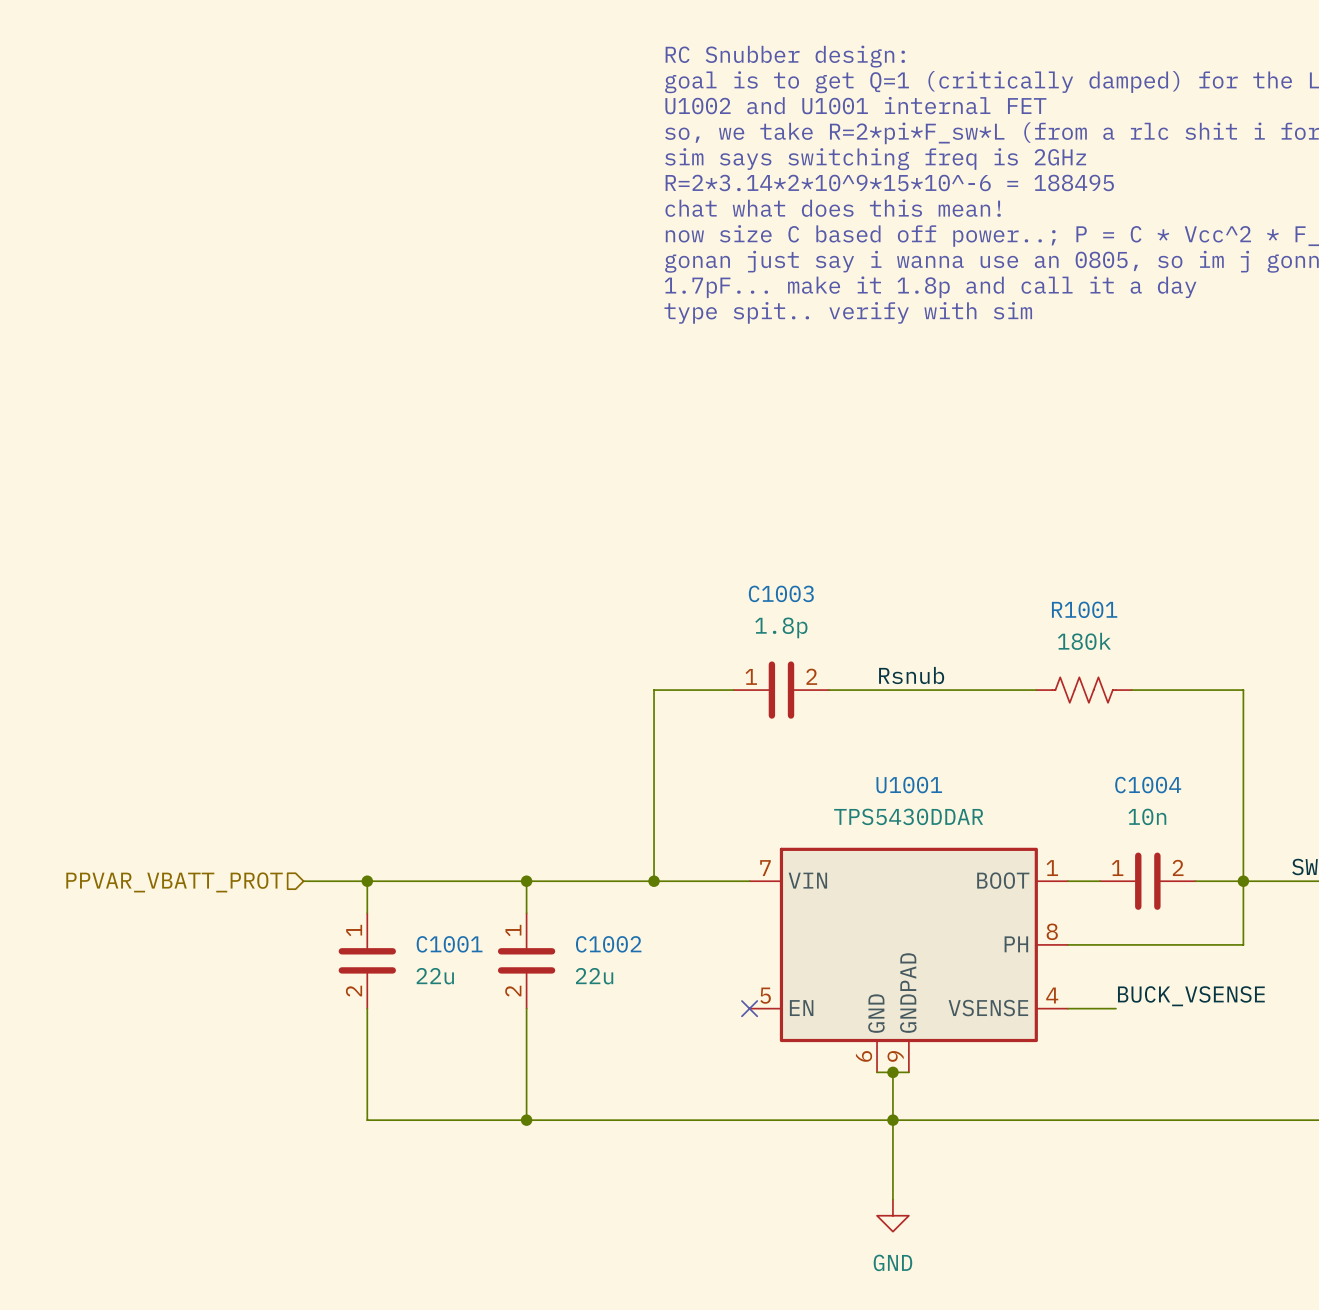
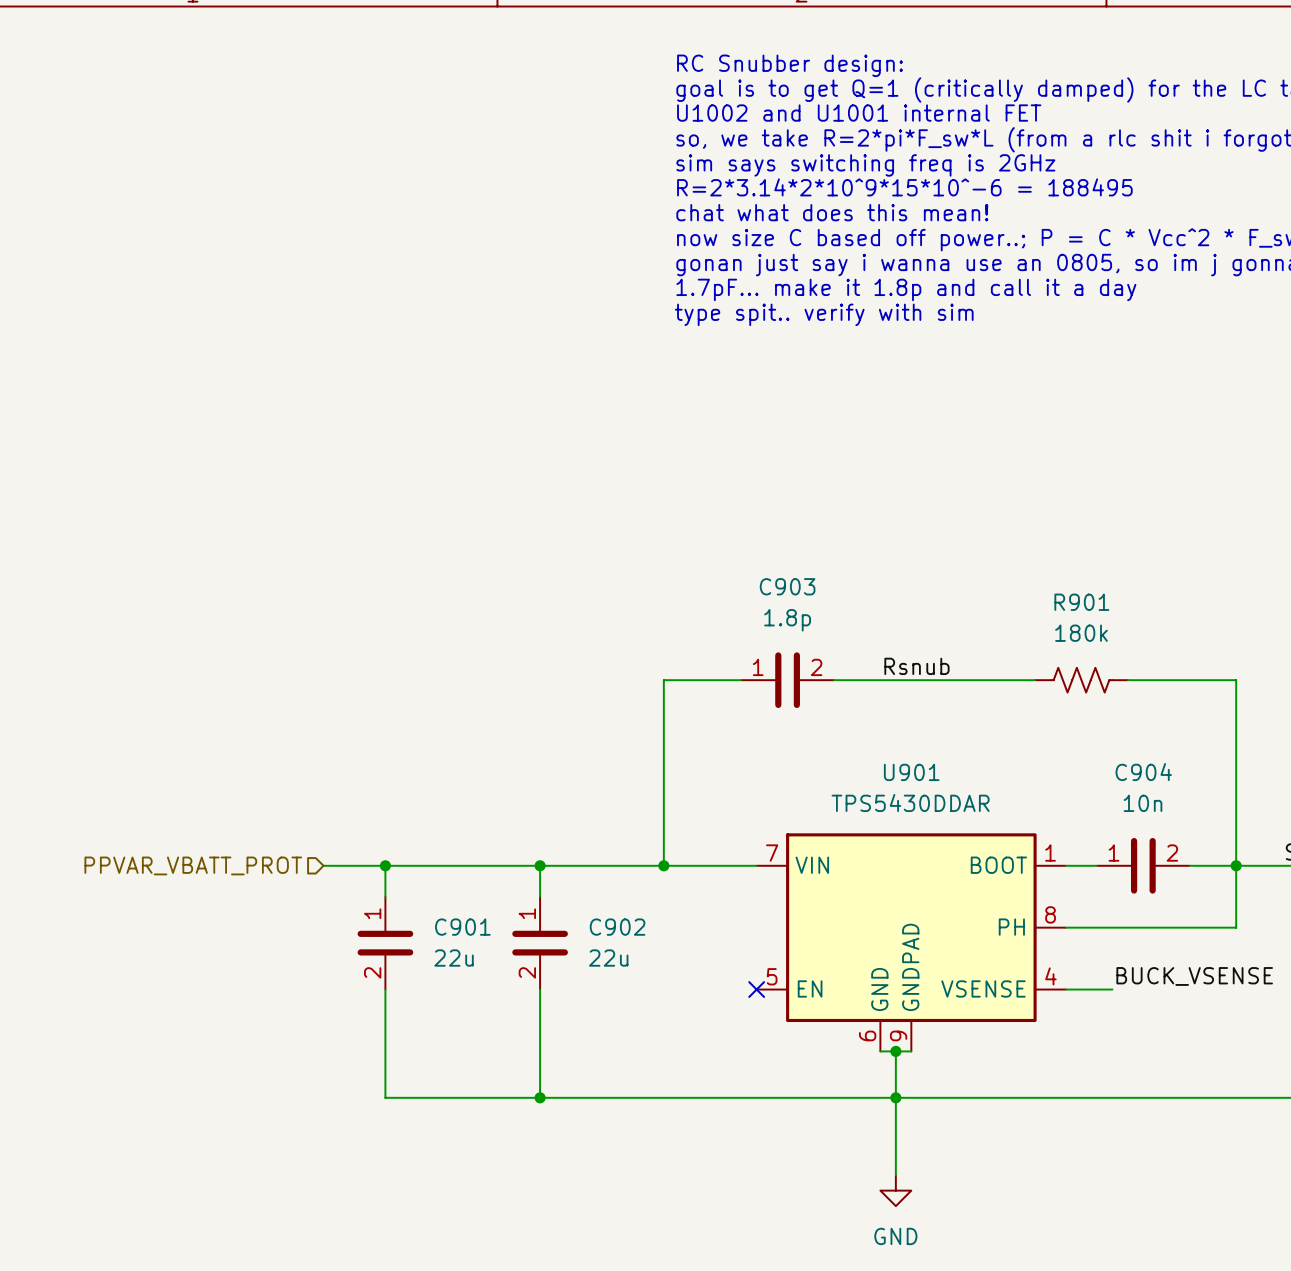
C1003 name: C1003 (781, 593) -> C903 (787, 586)
R1001 name: R1001 (1084, 609) -> R901 (1081, 602)
U1001 name: U1001 (909, 785) -> U901 (911, 772)
C1004 name: C1004 (1148, 785) -> C904 (1143, 772)
C1001 name: C1001 (449, 944) -> C901 (462, 927)
C1002 name: C1002 (608, 944) -> C902 (617, 927)

